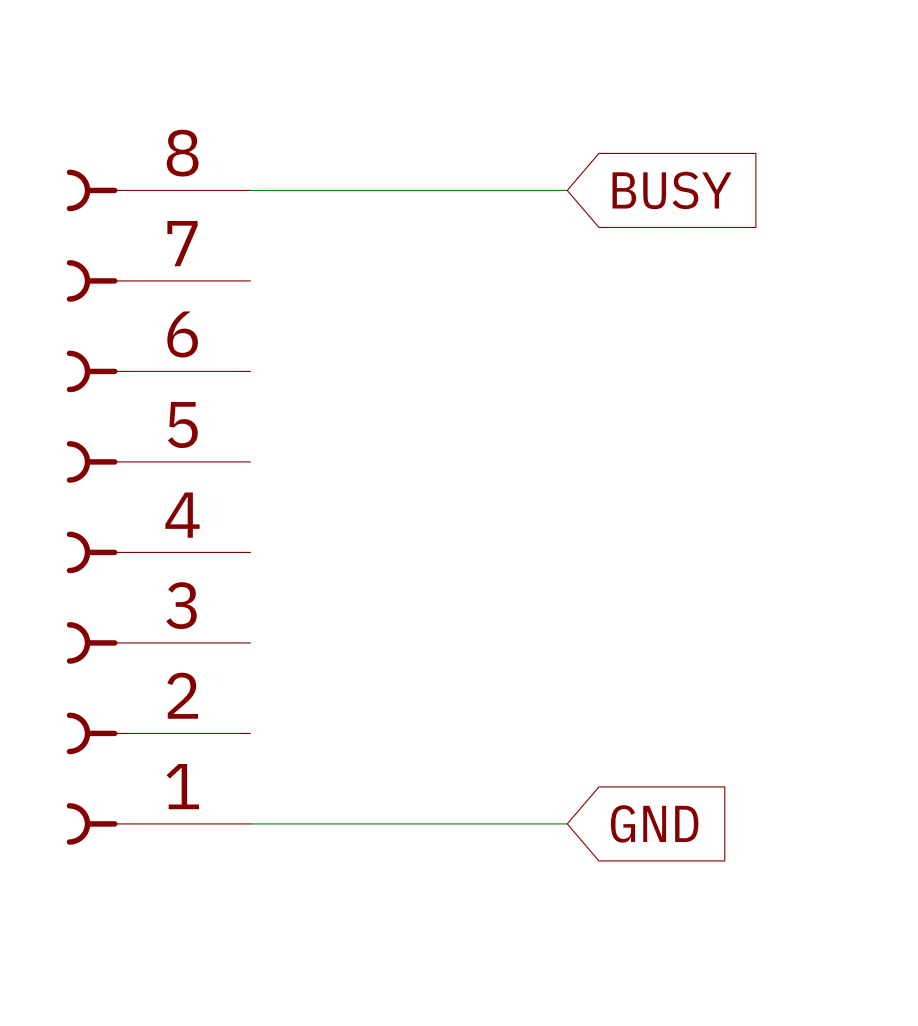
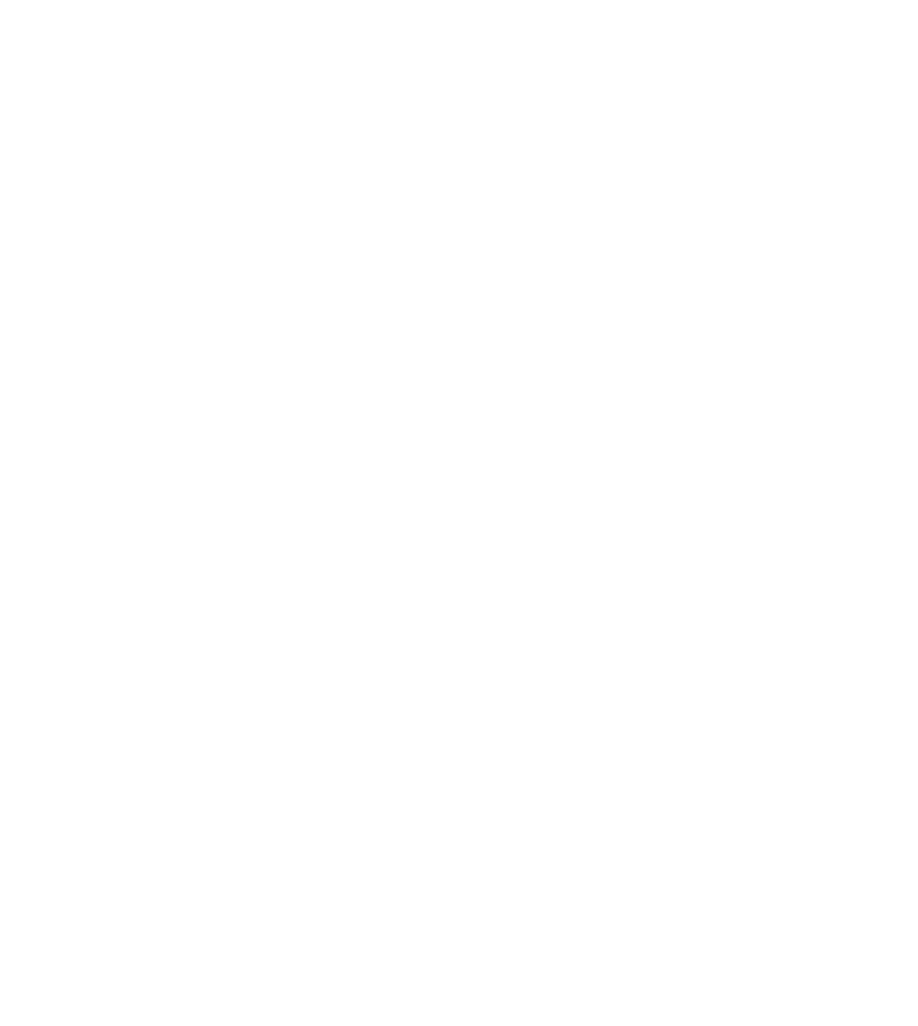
wire: (250, 190) (567, 190) -> none
global label: BUSY (672, 190) -> none
part: (158, 507) -> none
wire: (250, 823) (567, 823) -> none
global label: GND (654, 823) -> none

